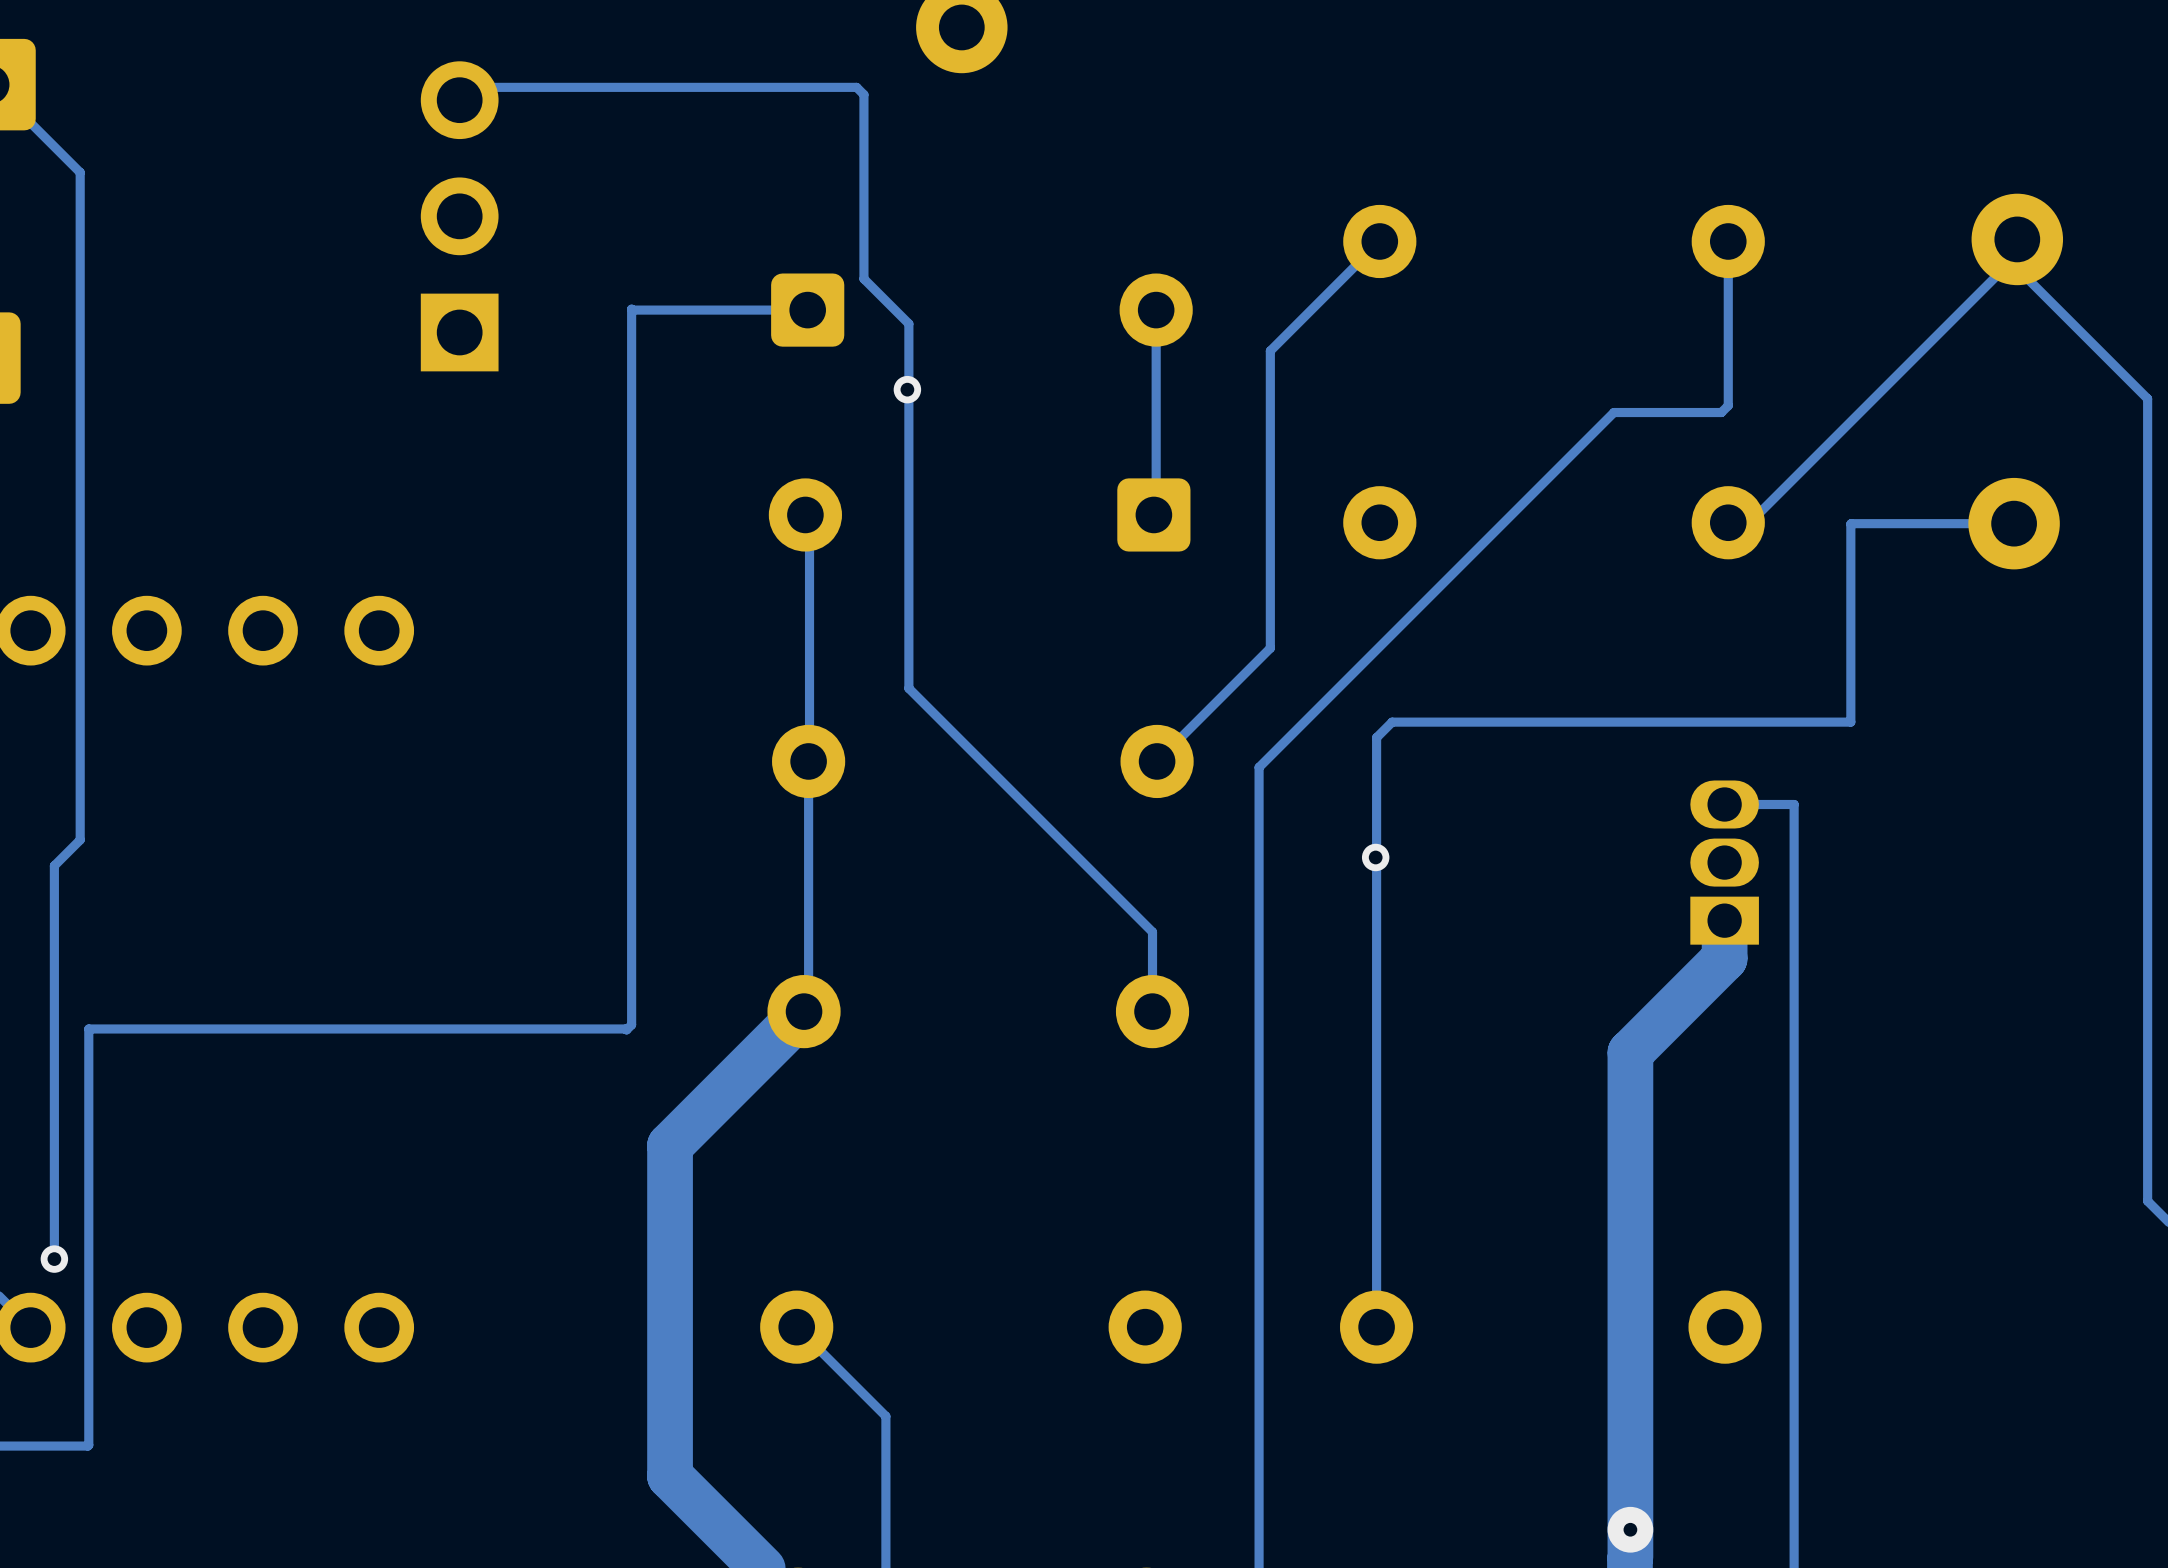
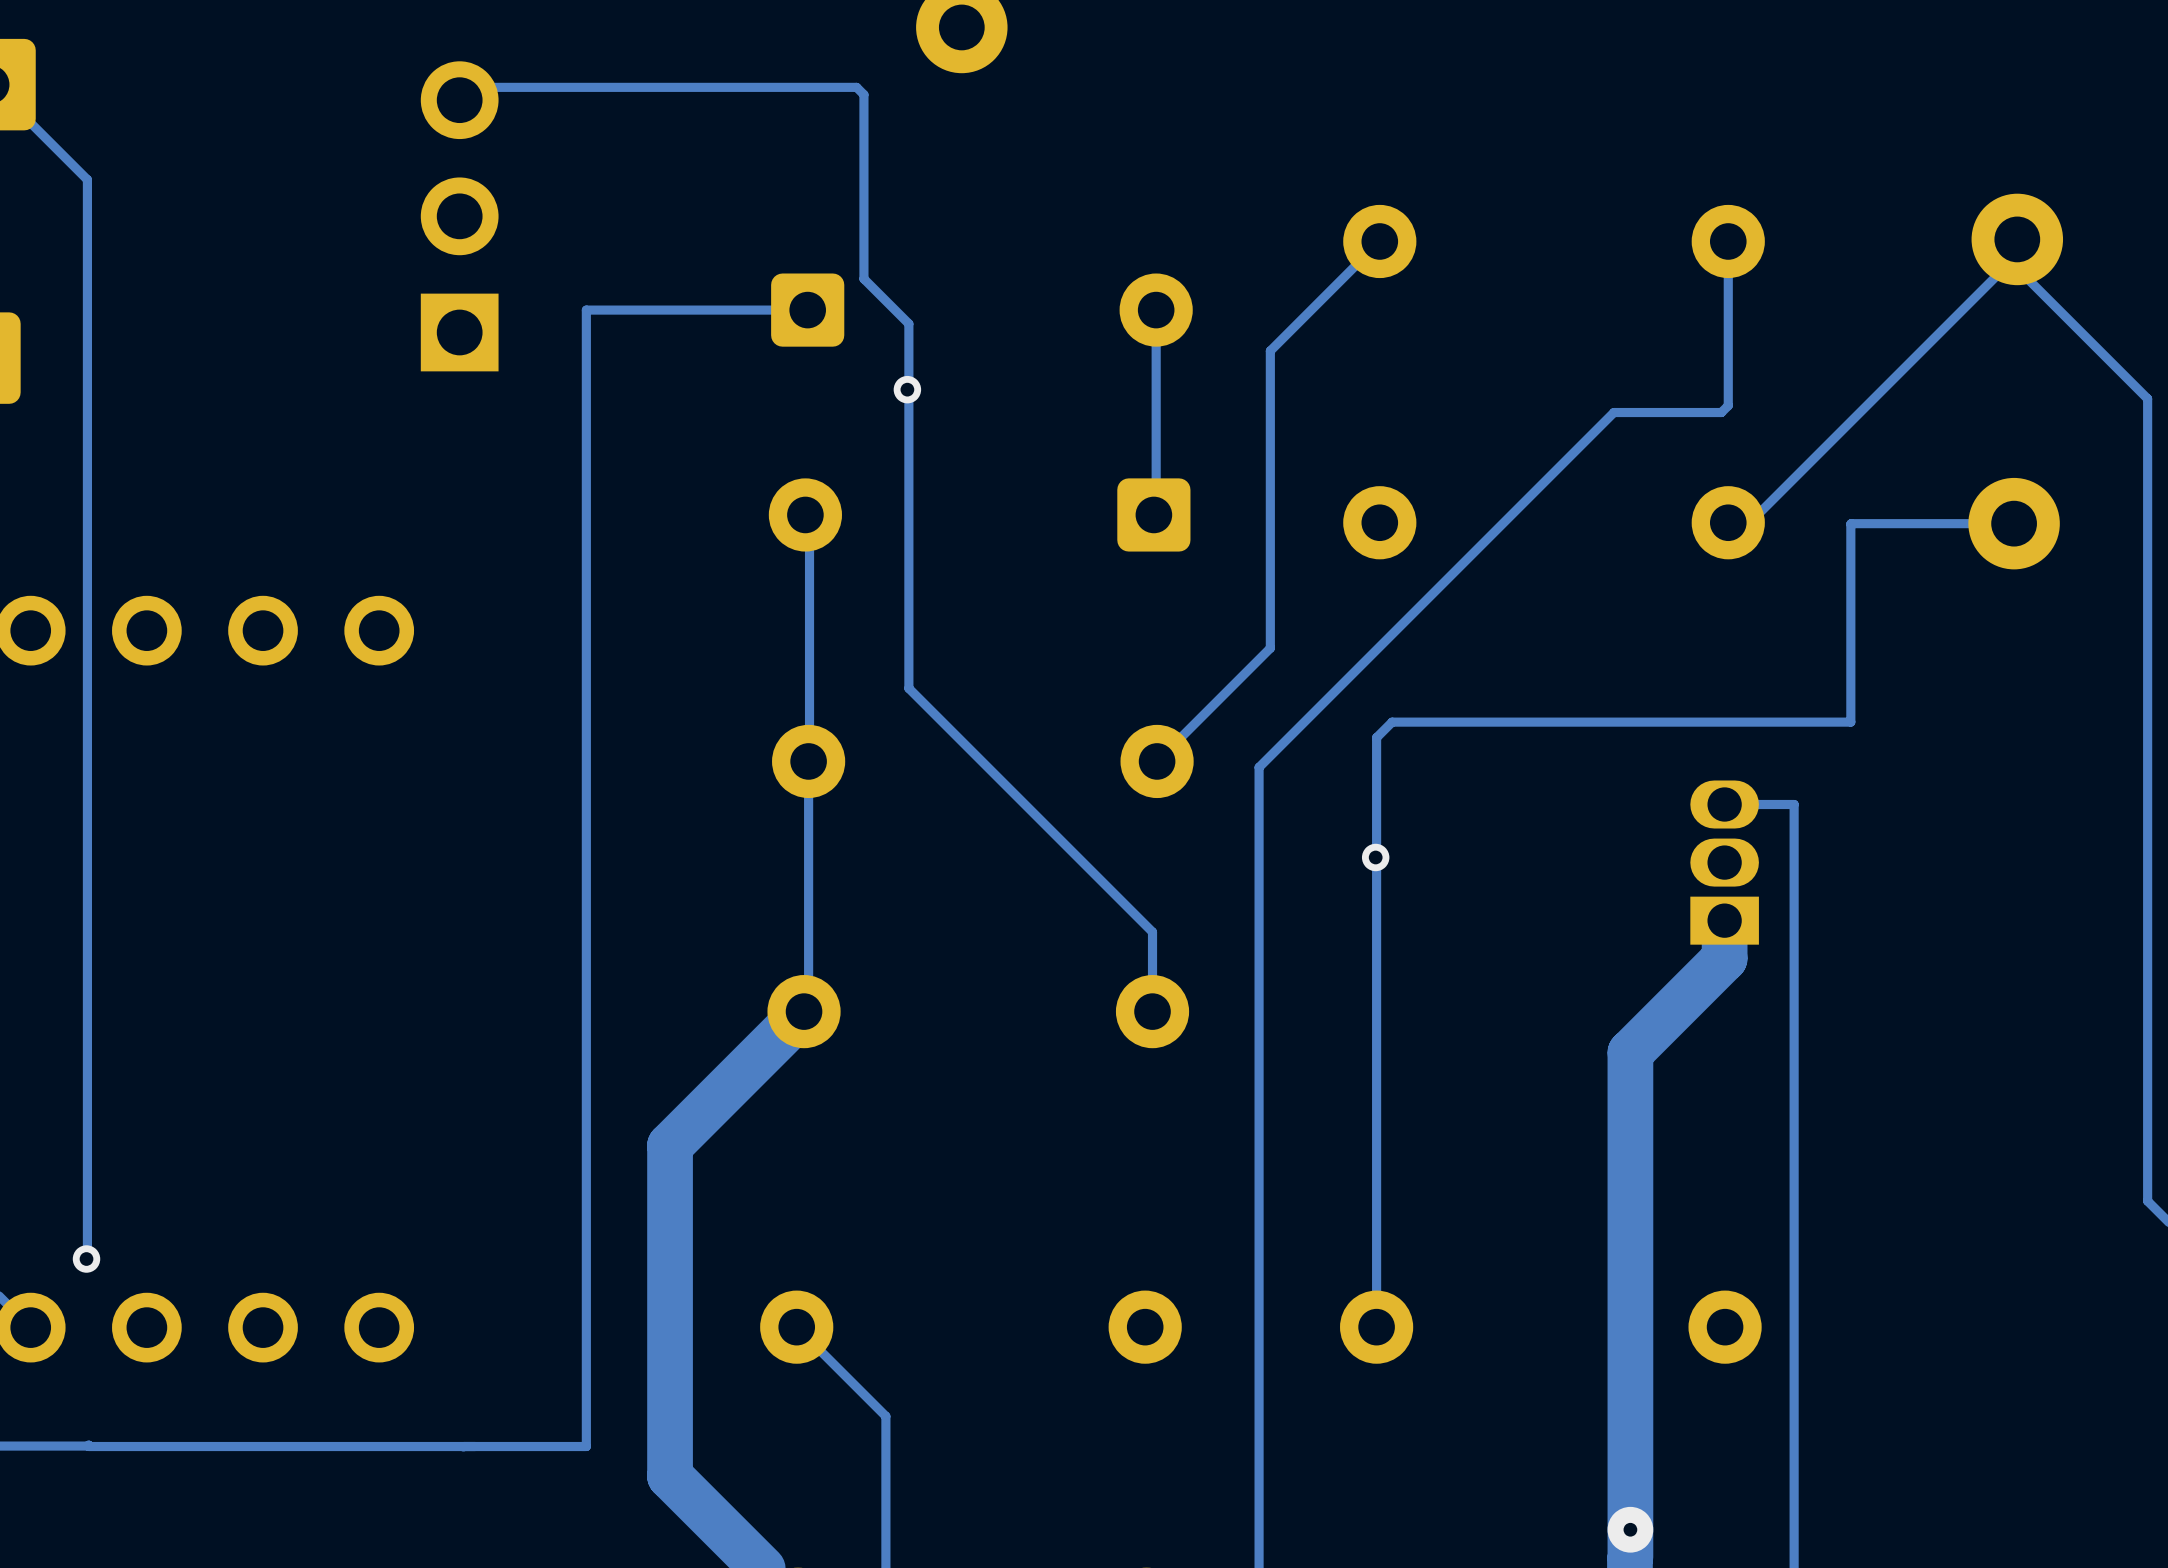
track: (80, 172) (80, 839) (54, 865) (54, 1259) -> (80, 172) (87, 179) (87, 1252) (80, 1259)
track: (632, 310) (631, 1024) (626, 1029) (88, 1028) (88, 1445) -> (632, 310) (586, 310) (586, 1446) (88, 1445)
via position: (54, 1259) -> (86, 1259)

